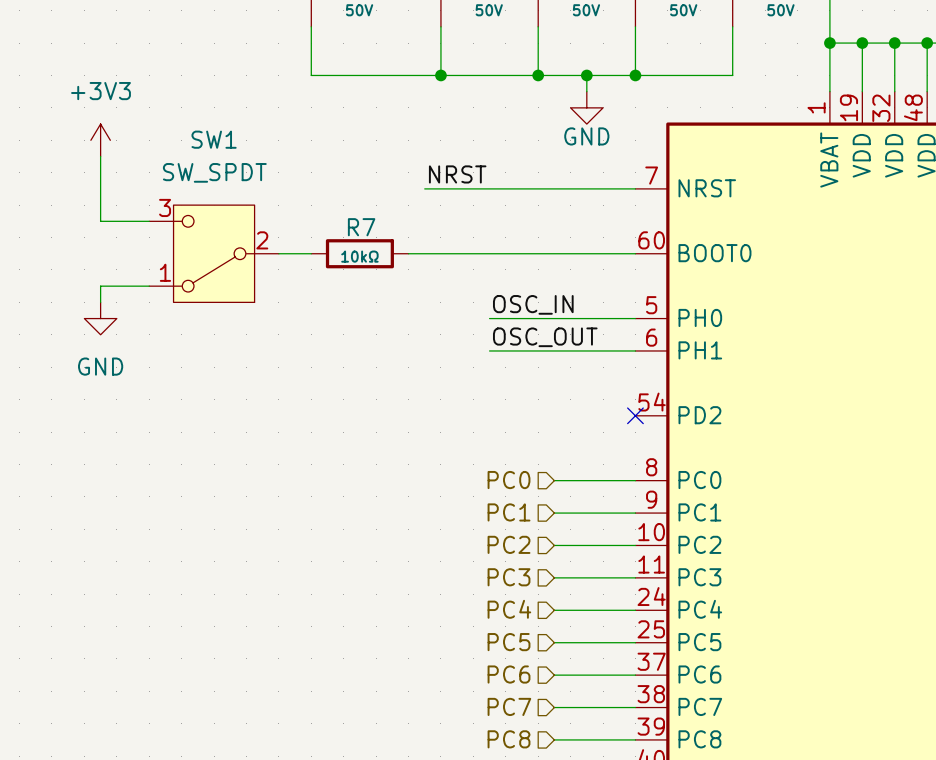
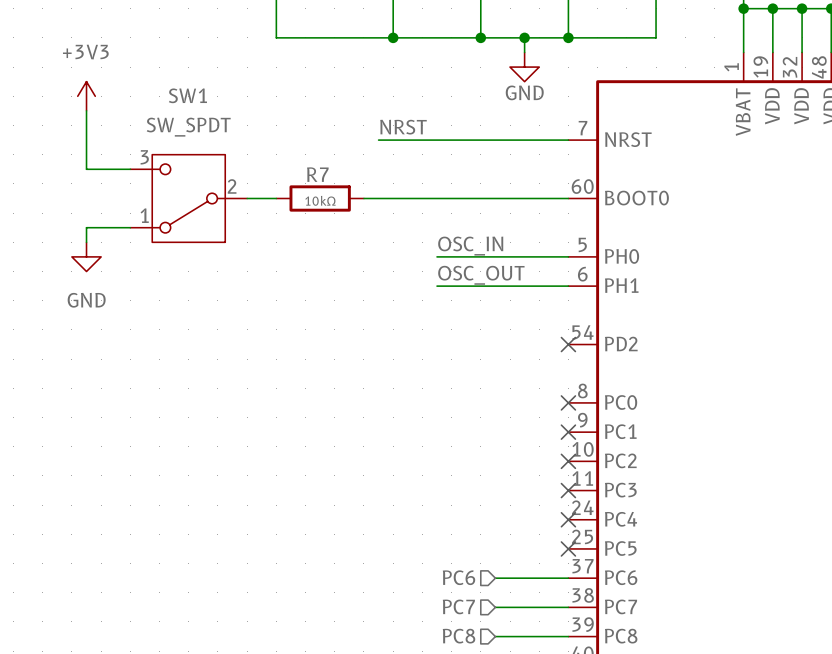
hierarchical label: PC0 (509, 480) -> none
wire: (554, 480) (635, 480) -> none
no-connect mark: none -> (568, 402)
hierarchical label: PC1 (509, 512) -> none
wire: (554, 513) (635, 513) -> none
no-connect mark: none -> (568, 432)
hierarchical label: PC2 (509, 544) -> none
wire: (554, 545) (635, 545) -> none
no-connect mark: none -> (568, 461)
hierarchical label: PC3 (509, 577) -> none
wire: (554, 577) (635, 577) -> none
no-connect mark: none -> (568, 490)
hierarchical label: PC4 (509, 609) -> none
wire: (554, 610) (635, 610) -> none
no-connect mark: none -> (568, 519)
hierarchical label: PC5 (509, 642) -> none
wire: (554, 642) (635, 642) -> none
no-connect mark: none -> (568, 548)

